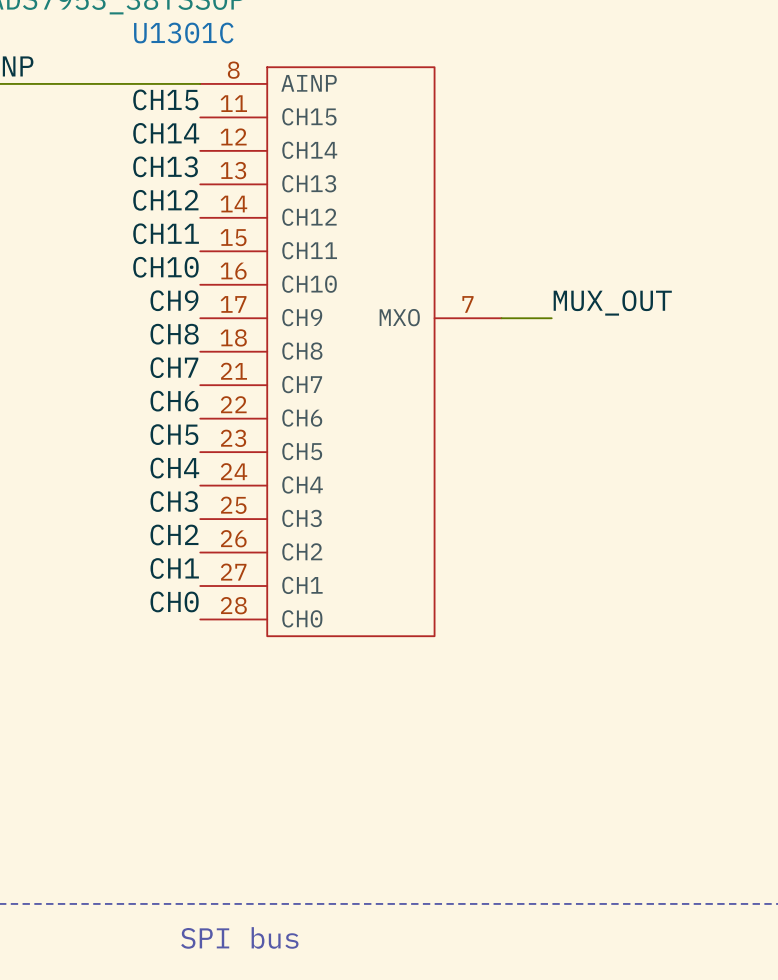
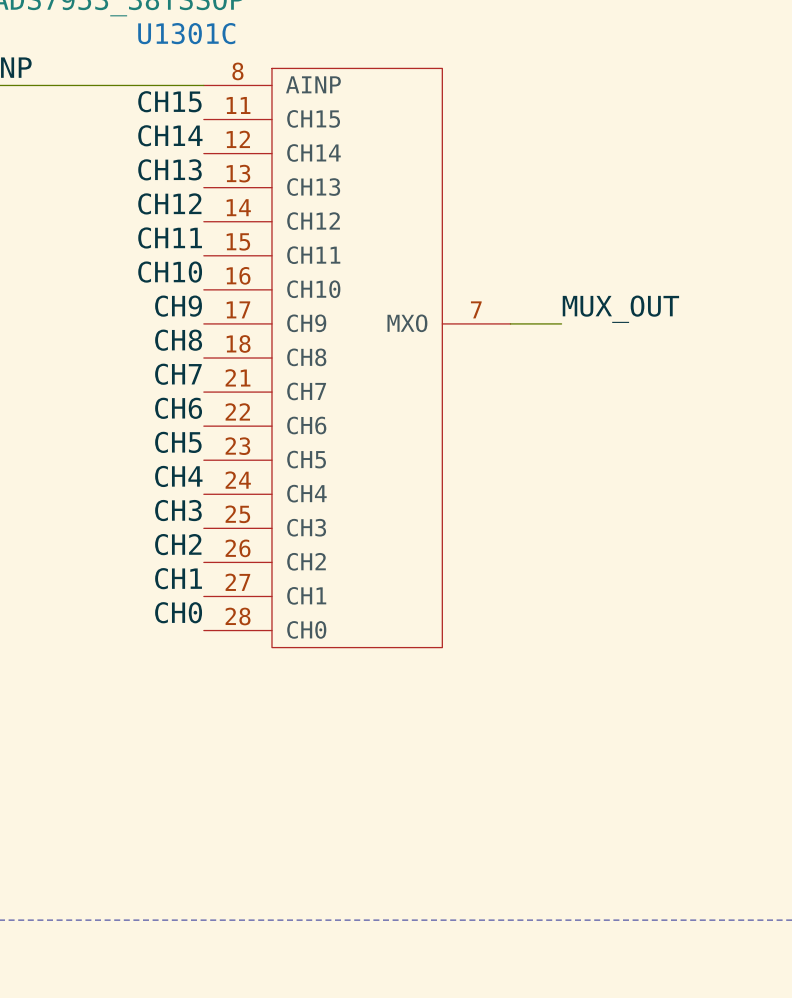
text: SPI bus (239, 937) -> none

